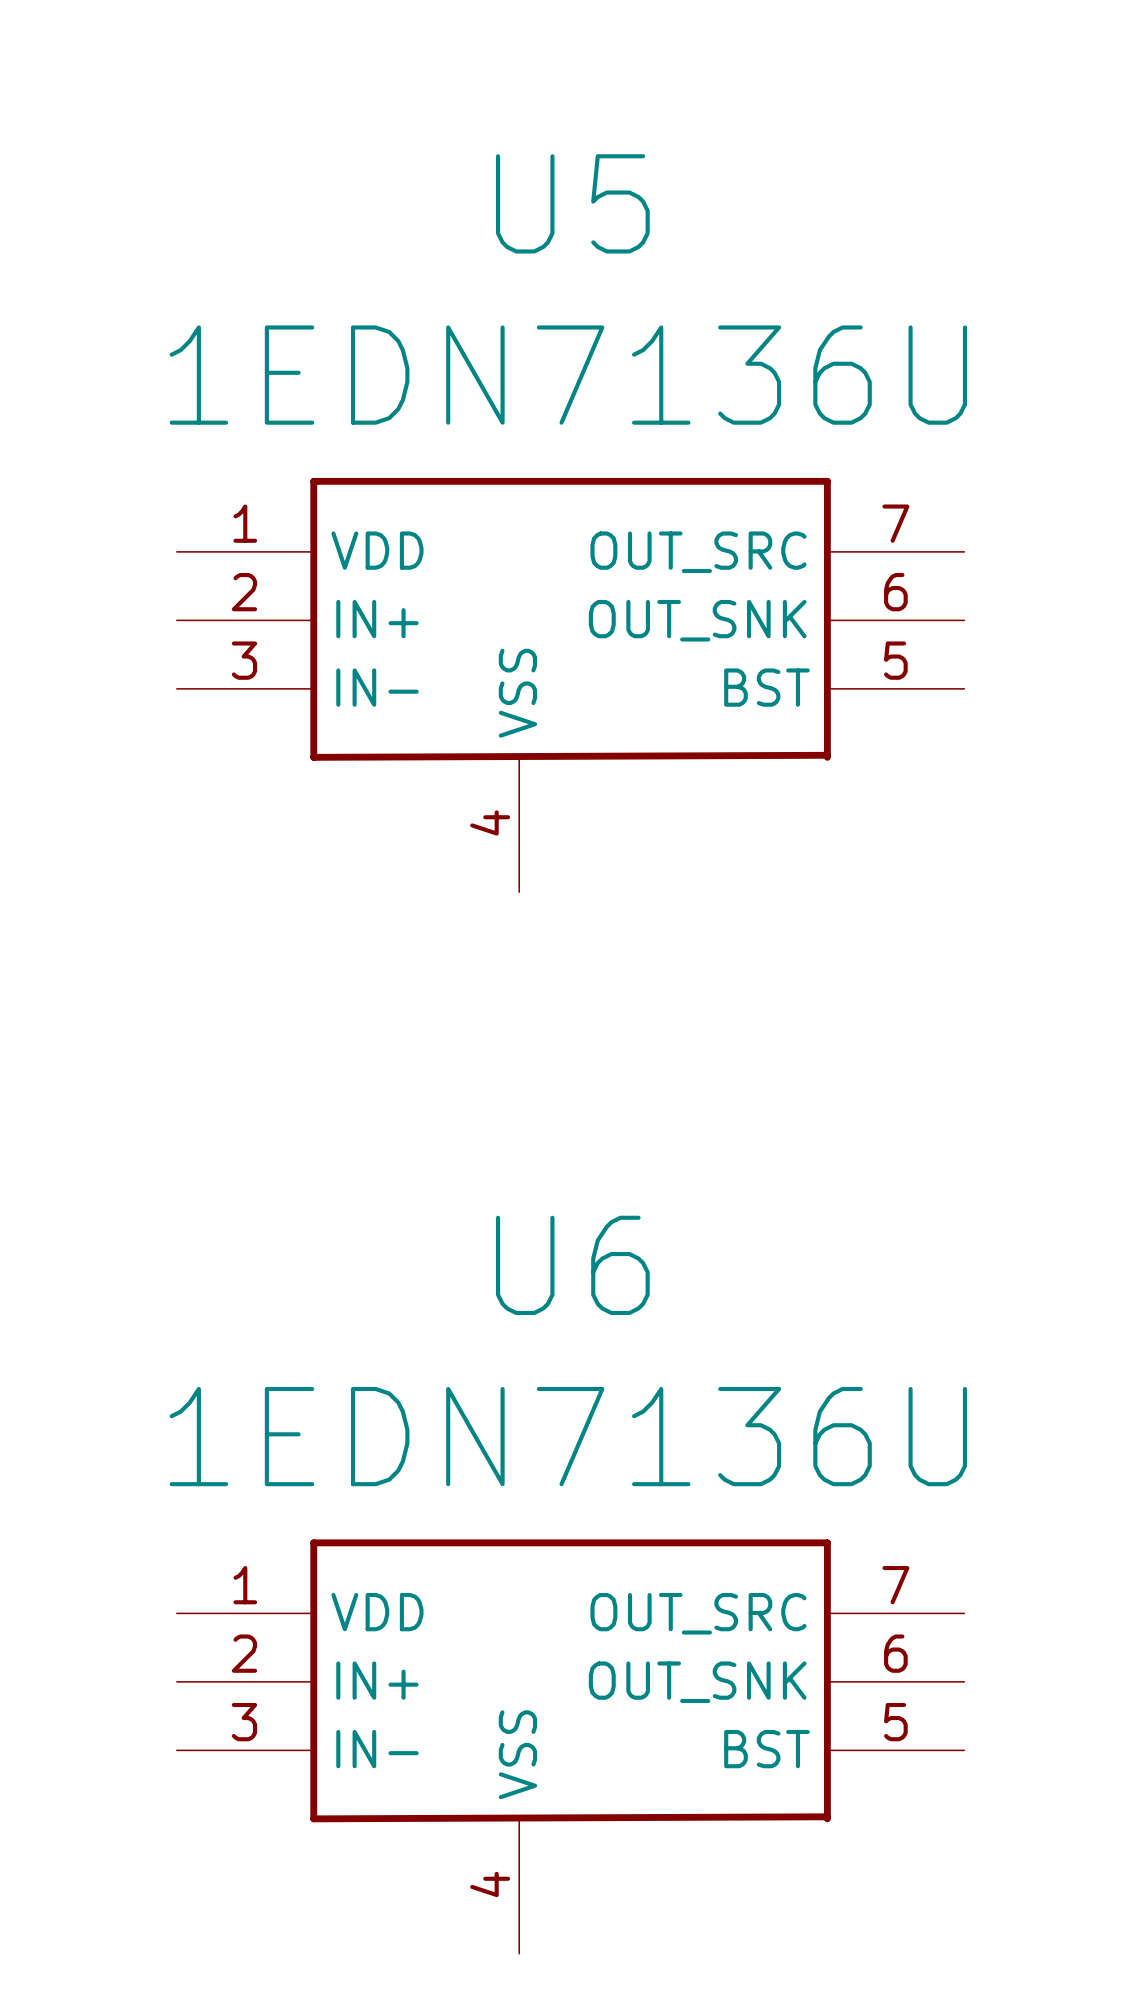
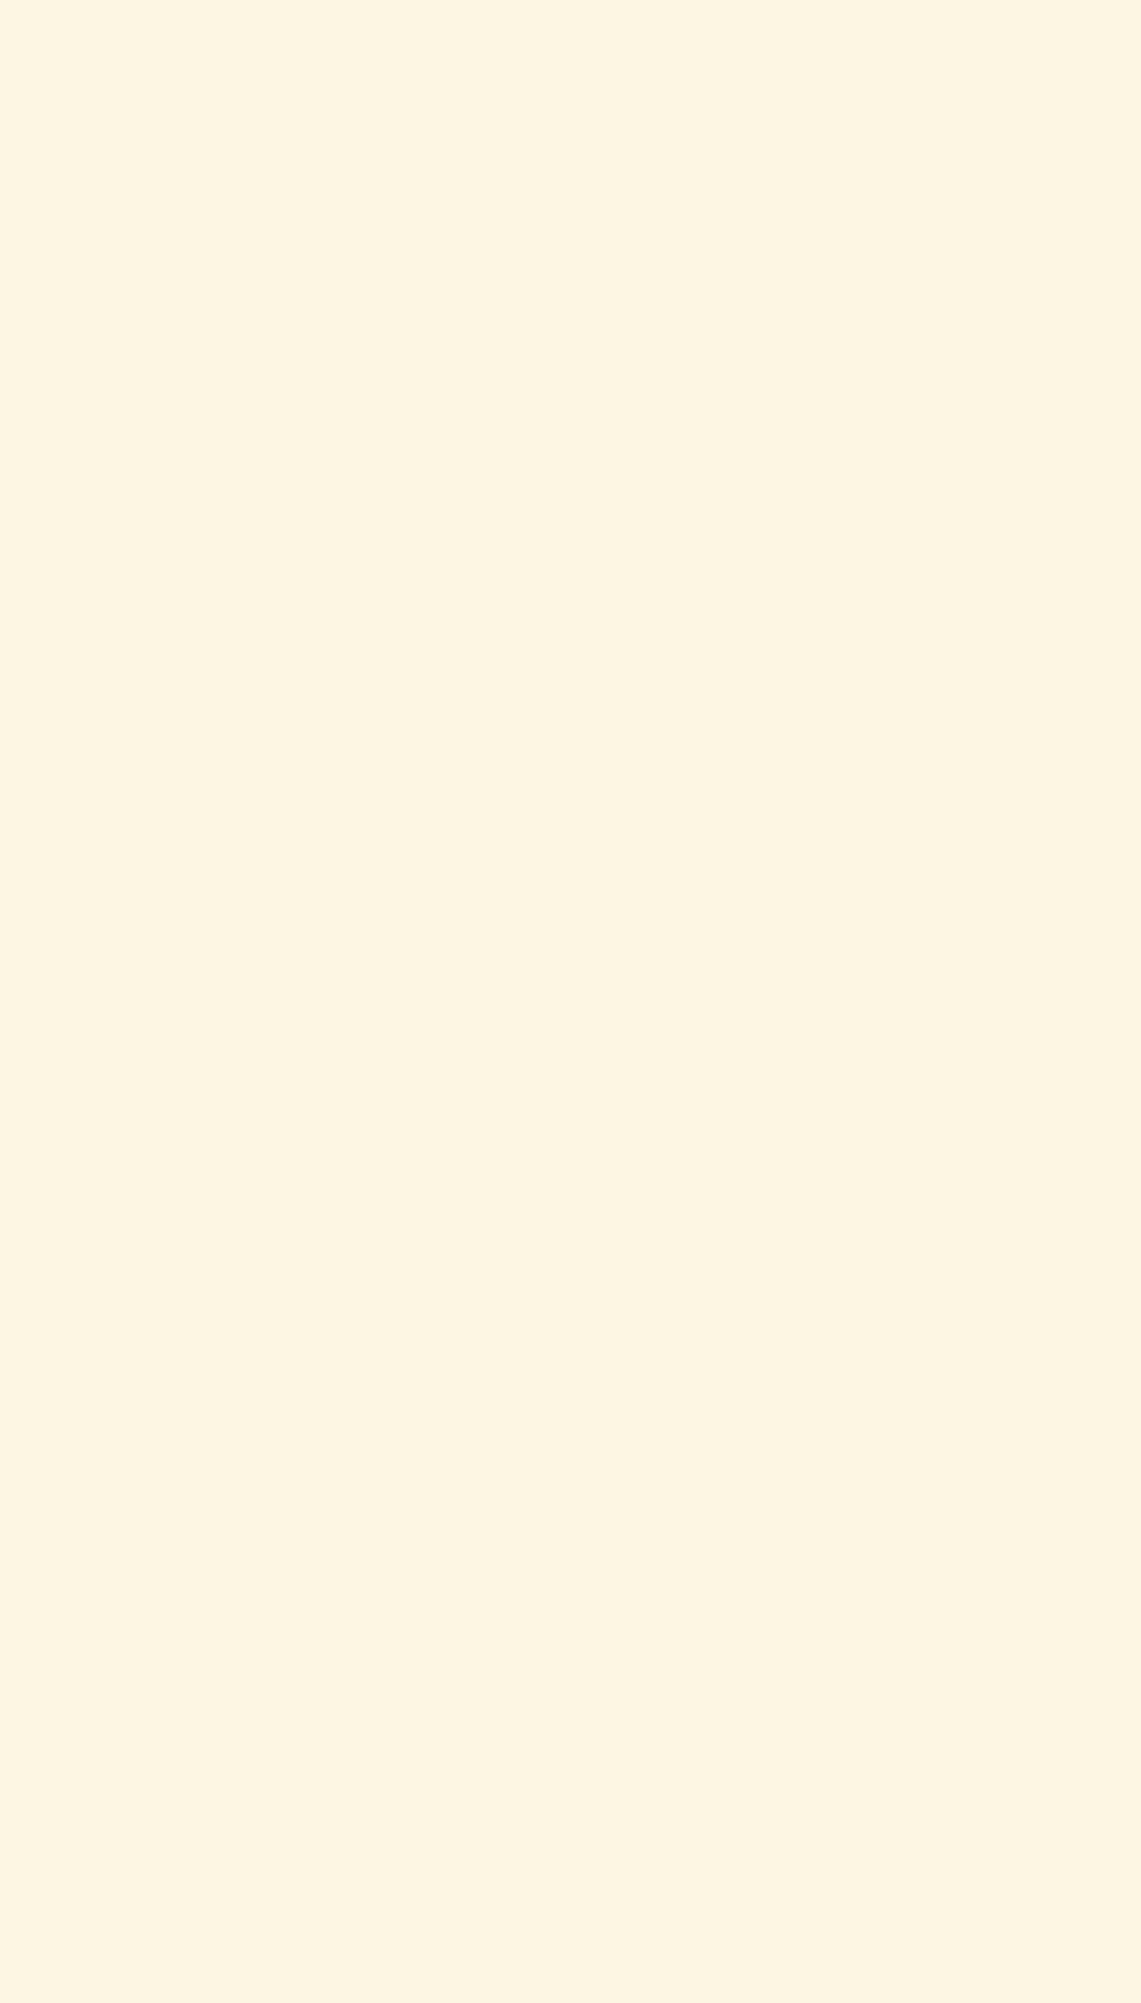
U5: 1EDN7136U (570, 685) -> none
U6: 1EDN7136U (570, 1746) -> none

